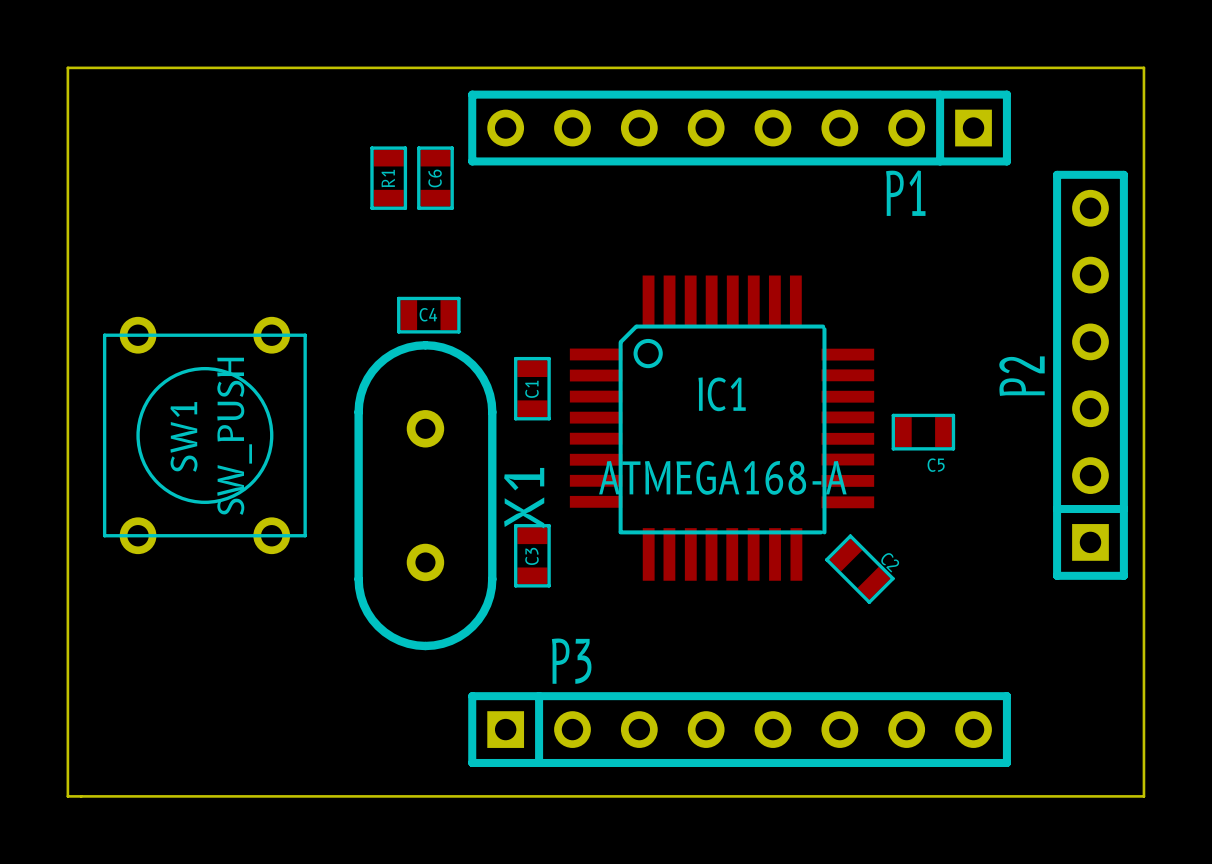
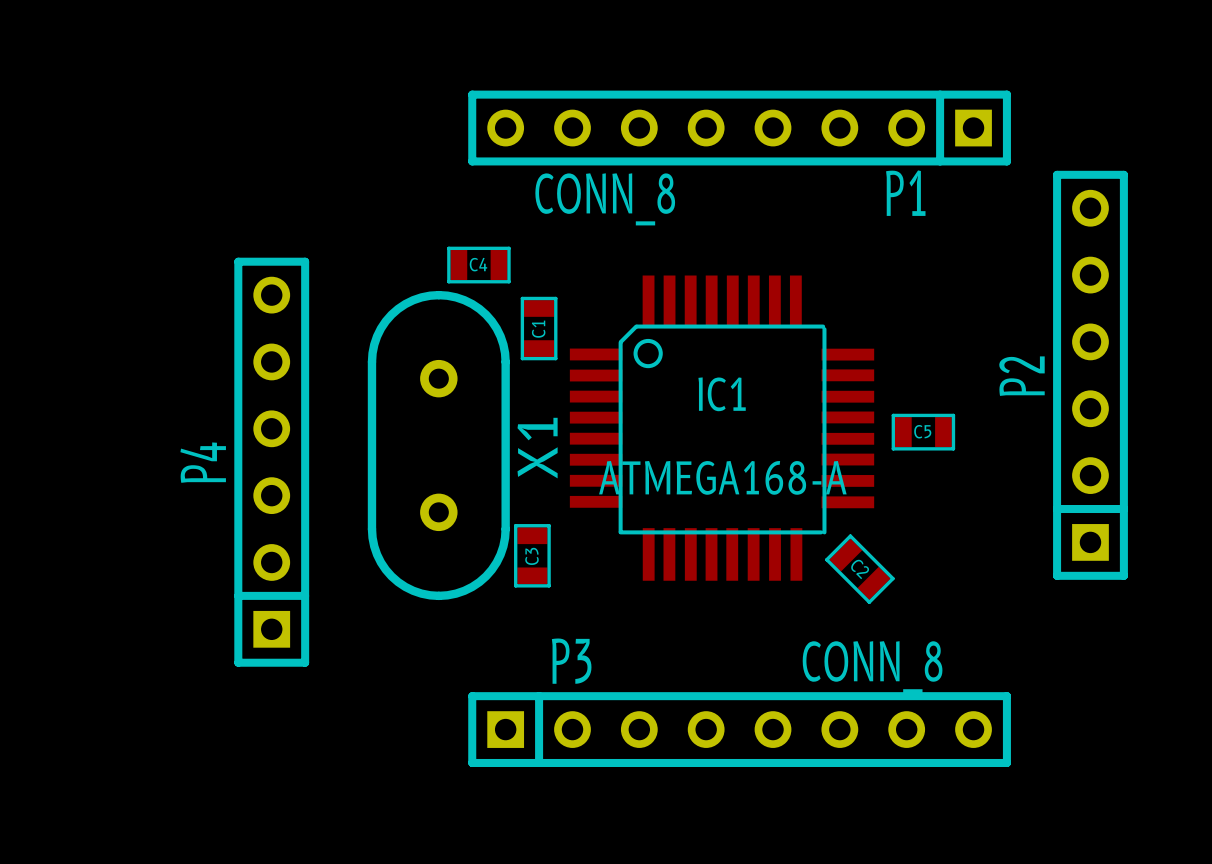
board edge: (67, 67) (67, 796) (1143, 796) (1143, 67) (67, 67) -> none
R1: (388, 178) -> none
C6: (435, 178) -> none
P1 value: none -> CONN_8 (605, 199)
C4 position: (428, 315) -> (478, 265)
C1 position: (532, 388) -> (539, 328)
SW1: SW_PUSH (204, 435) -> none
P4: none -> (271, 462)
C5 name position: C5 (936, 465) -> C5 (922, 431)
X1 position: (425, 495) -> (438, 445)
C2 name position: C2 (890, 562) -> C2 (860, 569)
P3 value: none -> CONN_8 (872, 667)

